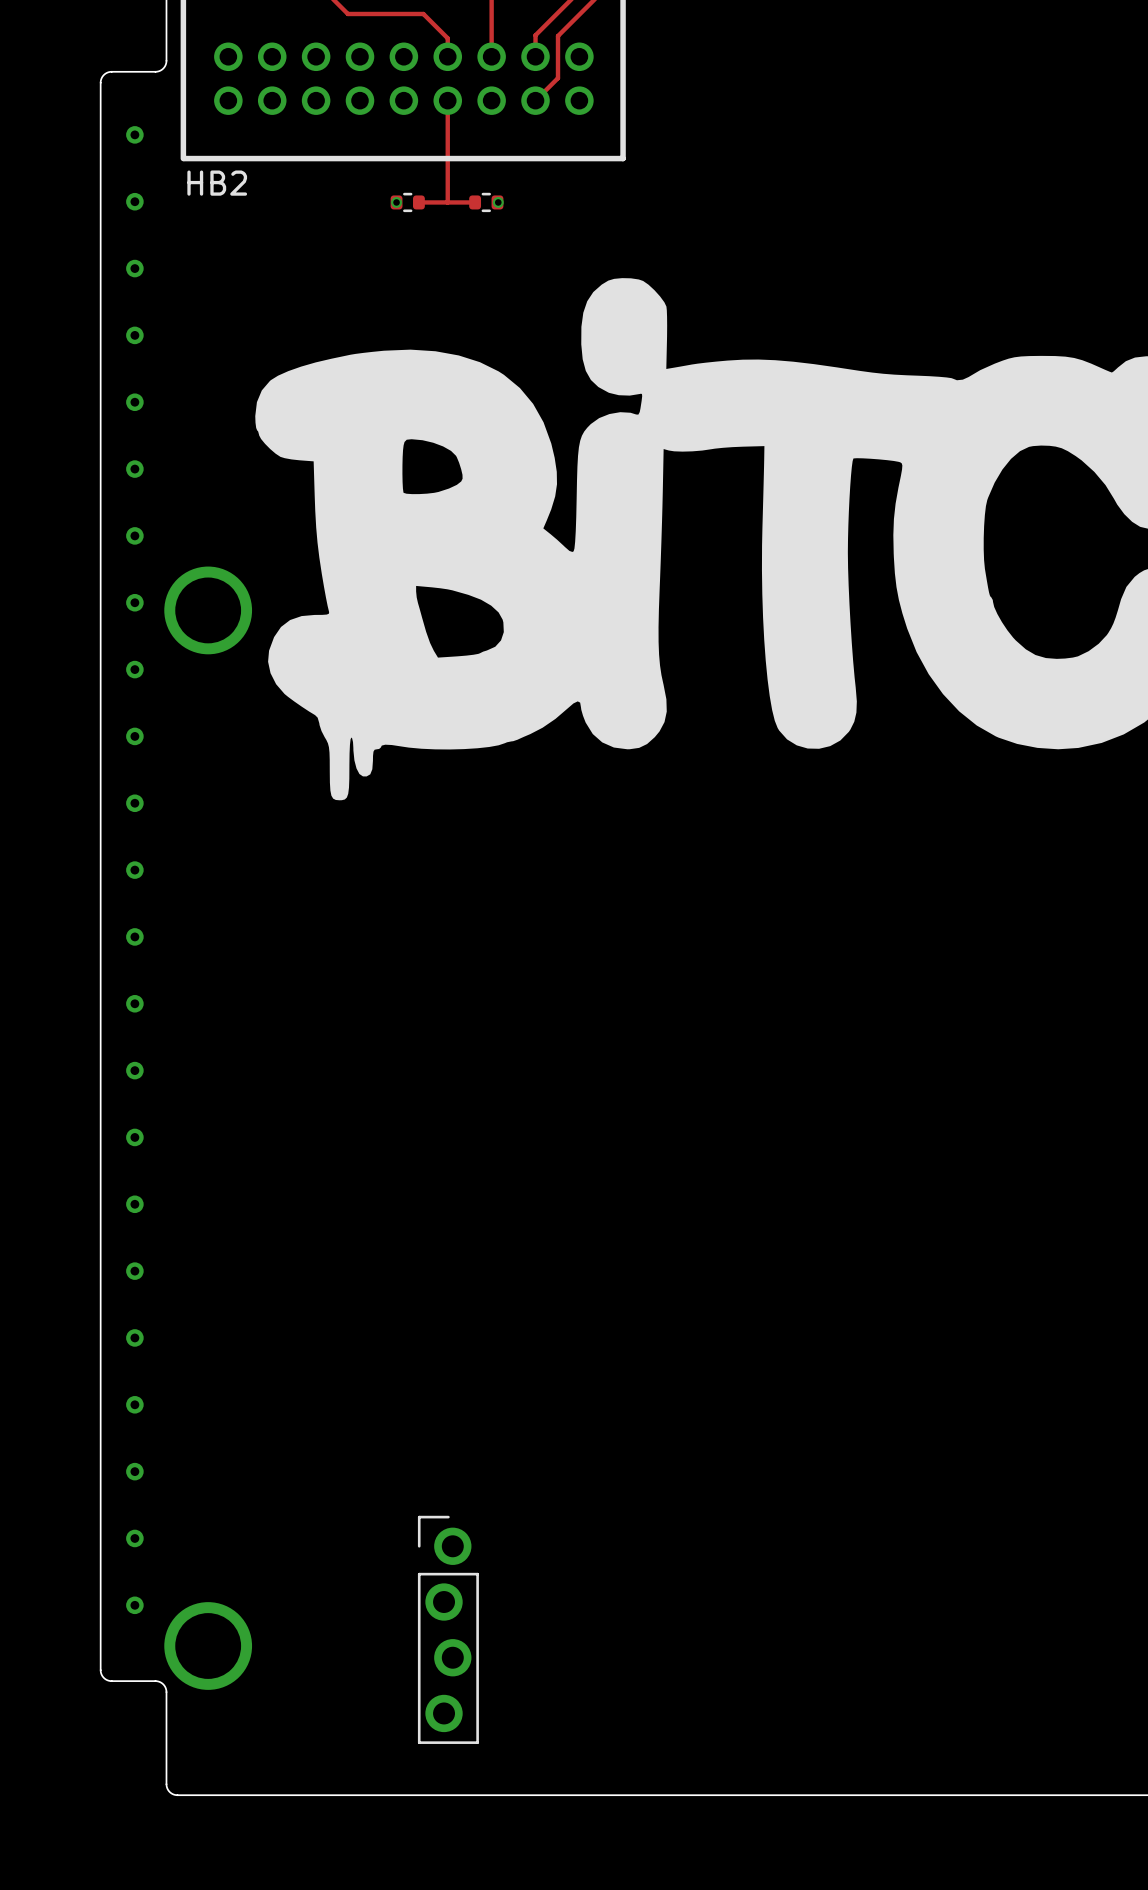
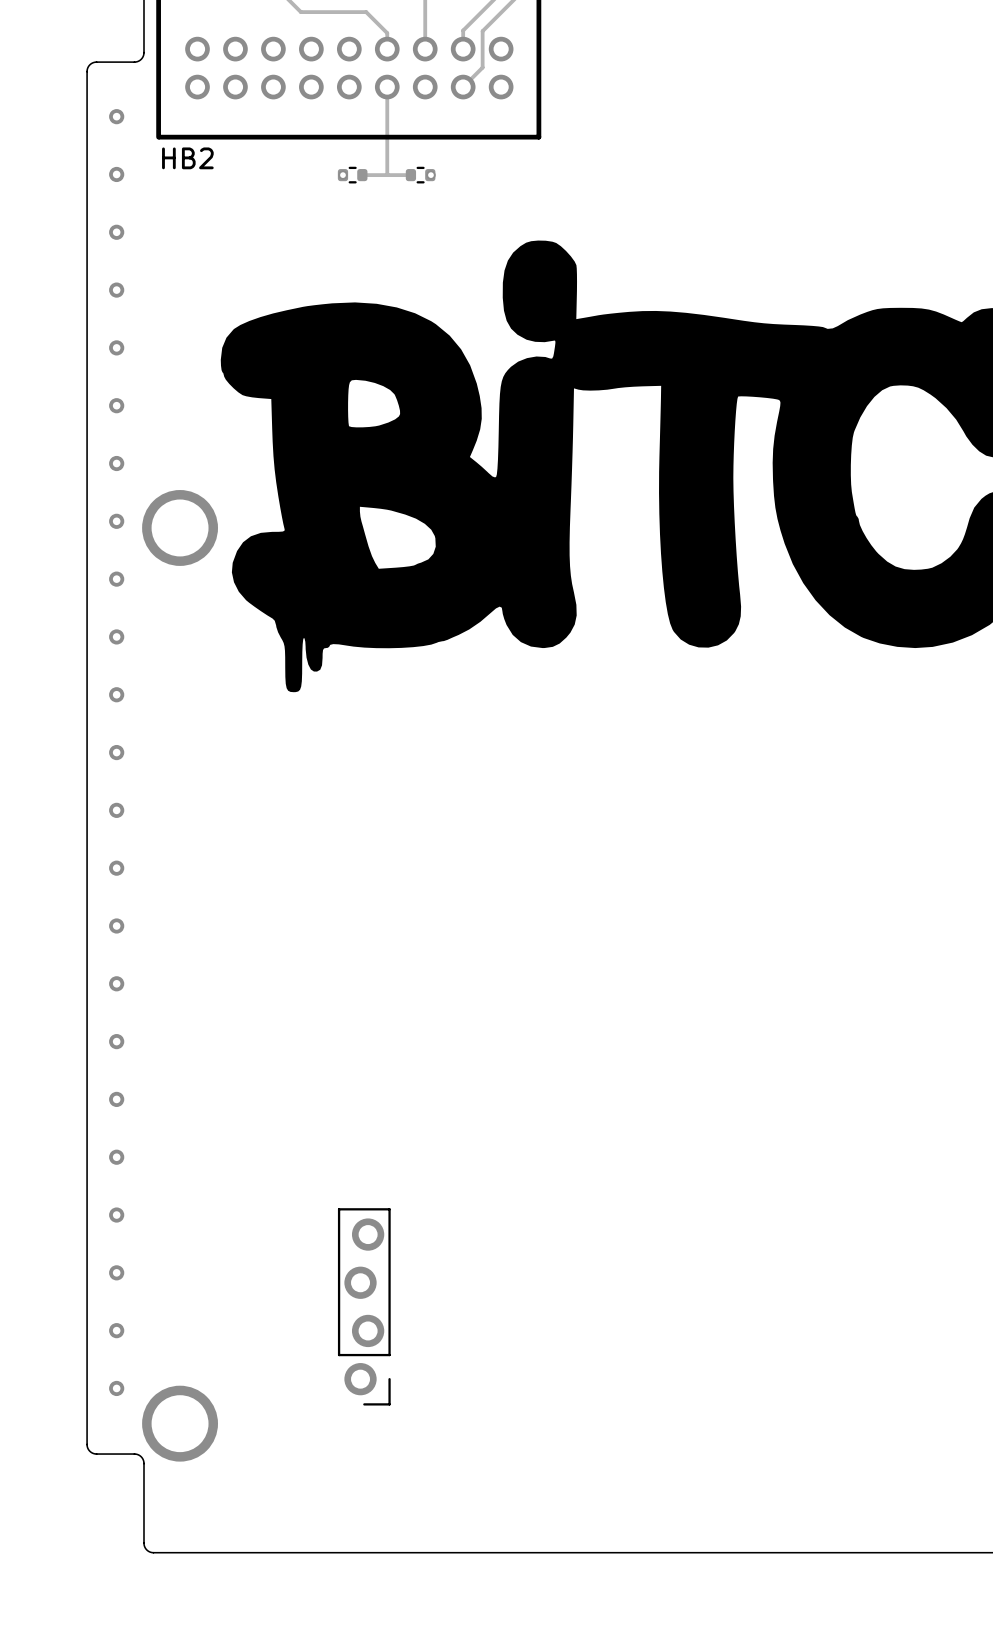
part rotation: 0° (448, 1629) -> 180° (364, 1306)

